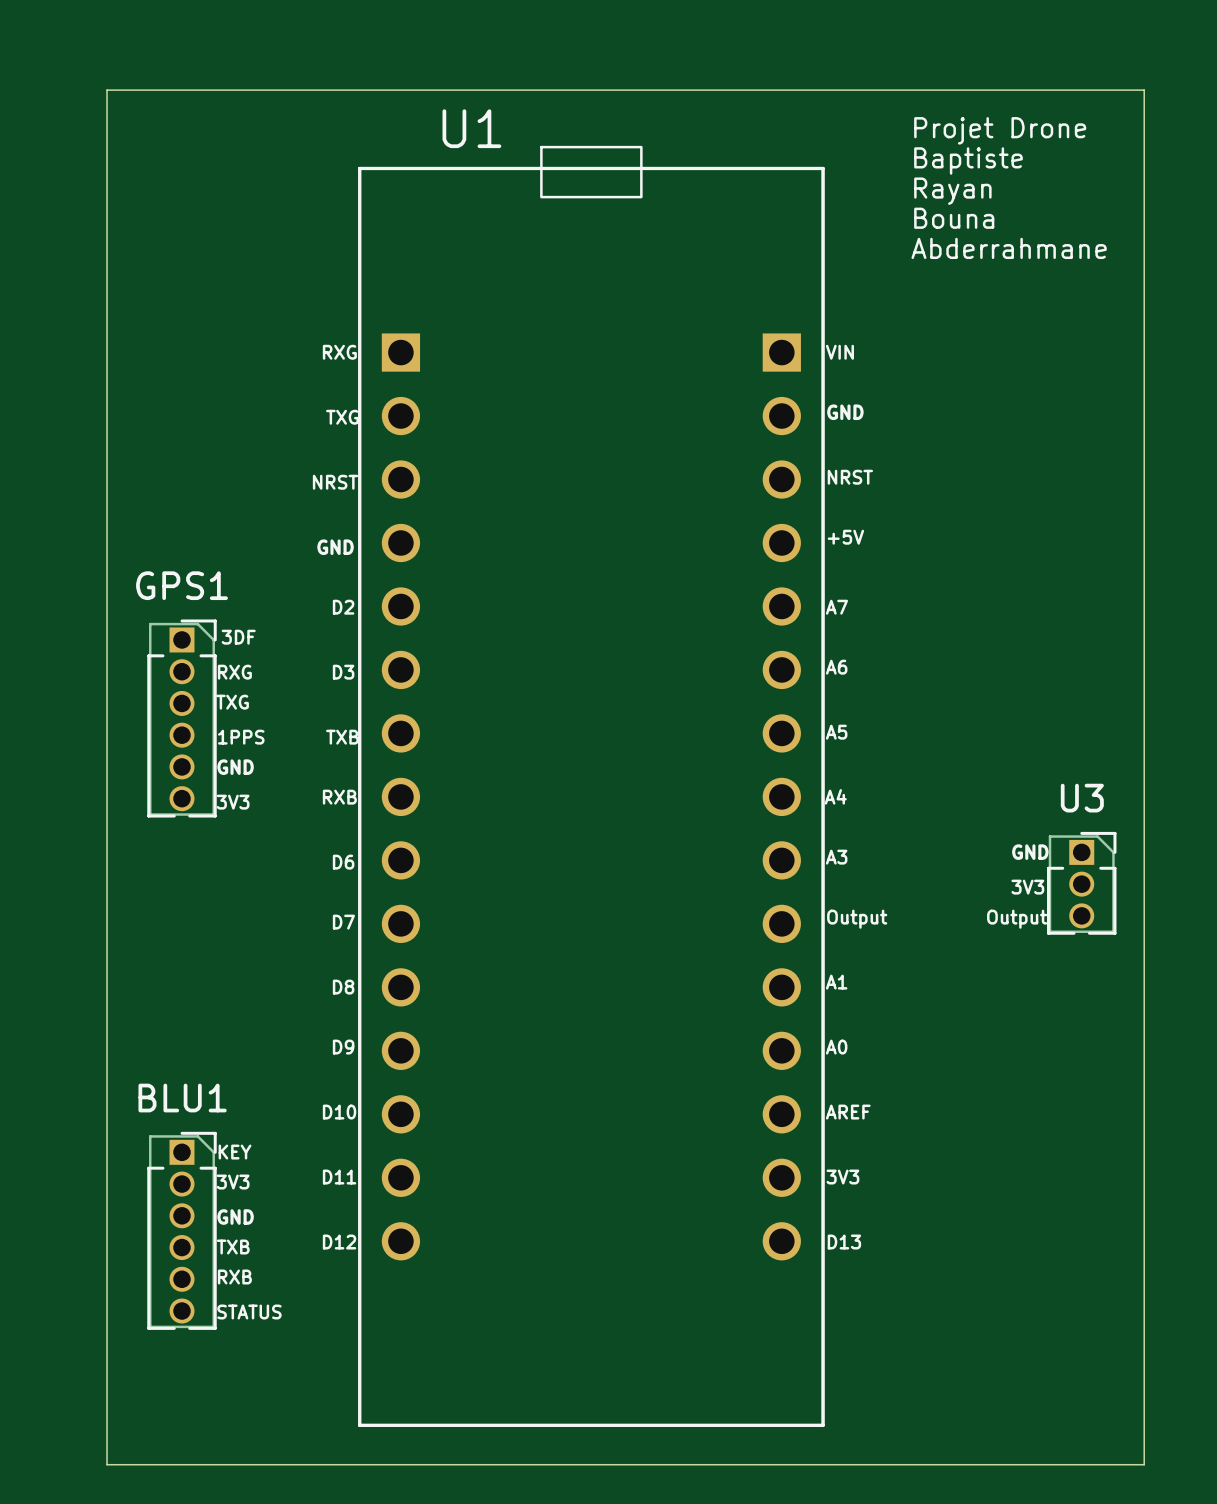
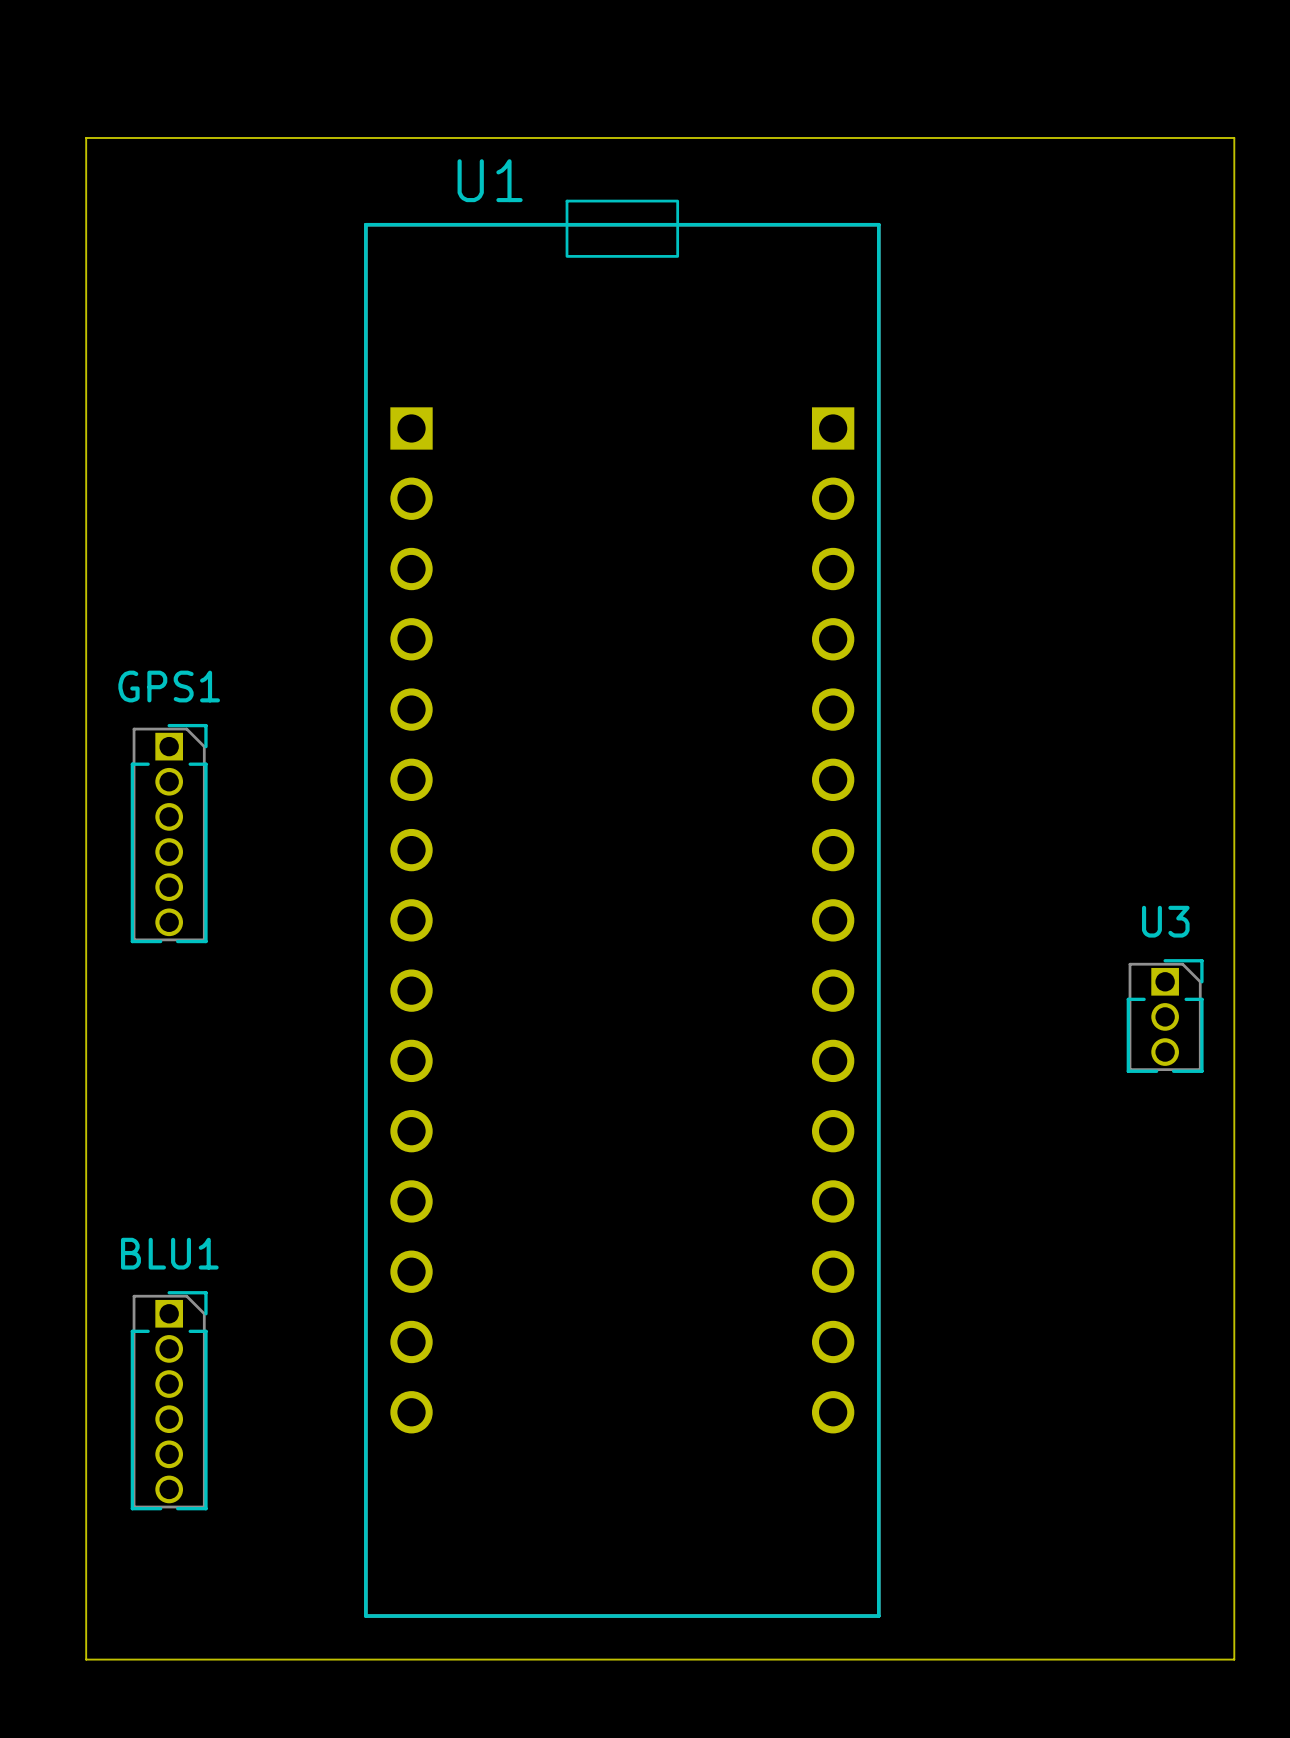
text: Projet Drone (1000, 130) -> none
text: Baptiste (968, 161) -> none
text: Rayan (952, 191) -> none
text: Bouna (954, 218) -> none
text: Abderrahmane (1009, 248) -> none
text: RXG (339, 352) -> none
text: VIN (839, 352) -> none
text: GND (845, 412) -> none
text: TXG (342, 417) -> none
text: NRST (850, 477) -> none
text: NRST (335, 482) -> none
text: +5V (845, 537) -> none
text: GND (335, 547) -> none
text: D2 (343, 607) -> none
text: A7 (836, 607) -> none
text: 3DF (238, 637) -> none
text: A6 (836, 667) -> none
text: RXG (234, 672) -> none
text: D3 (343, 672) -> none
text: TXG (232, 702) -> none
text: A5 (836, 732) -> none
text: 1PPS (241, 737) -> none
text: TXB (342, 737) -> none
text: GND (235, 767) -> none
text: A4 (835, 796) -> none
text: RXB (339, 797) -> none
text: 3V3 (233, 802) -> none
text: GND (1030, 852) -> none
text: A3 (836, 857) -> none
text: D6 (343, 862) -> none
text: 3V3 (1027, 887) -> none
text: Output (857, 919) -> none
text: Output (1017, 919) -> none
text: D7 (343, 922) -> none
text: A1 (836, 982) -> none
text: D8 (343, 987) -> none
text: D9 (343, 1047) -> none
text: A0 (836, 1047) -> none
text: D10 (339, 1112) -> none
text: AREF (848, 1112) -> none
text: KEY (235, 1152) -> none
text: D11 (339, 1177) -> none
text: 3V3 (842, 1177) -> none
text: 3V3 (233, 1182) -> none
text: GND (235, 1217) -> none
text: D12 (339, 1242) -> none
text: D13 (844, 1242) -> none
text: TXB (233, 1247) -> none
text: RXB (234, 1277) -> none
text: STATUS (249, 1311) -> none

